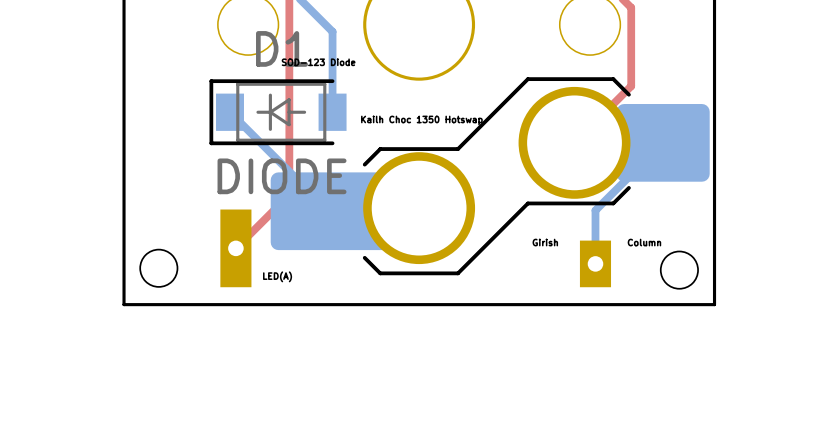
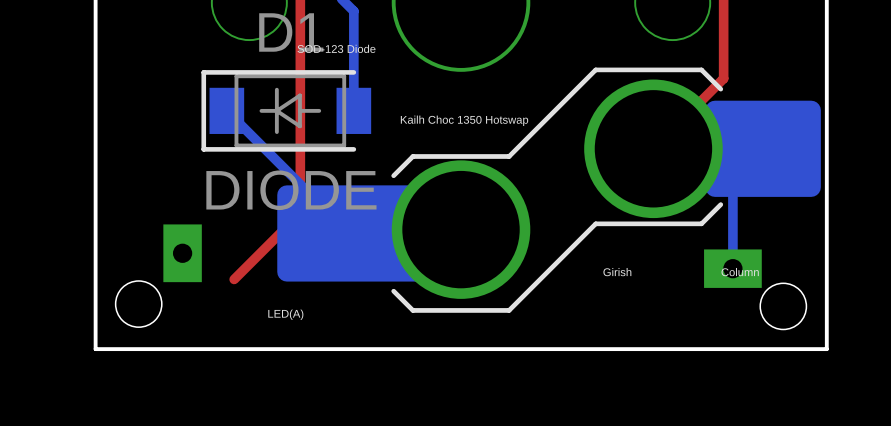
bottom track: (638, 167) (595, 210) (595, 263) -> (732, 179) (732, 268)
part: none -> (182, 253)
part: (235, 248) -> none
part rotation: 0° (595, 263) -> 90° clockwise (732, 268)
part position: (595, 263) -> (732, 268)

